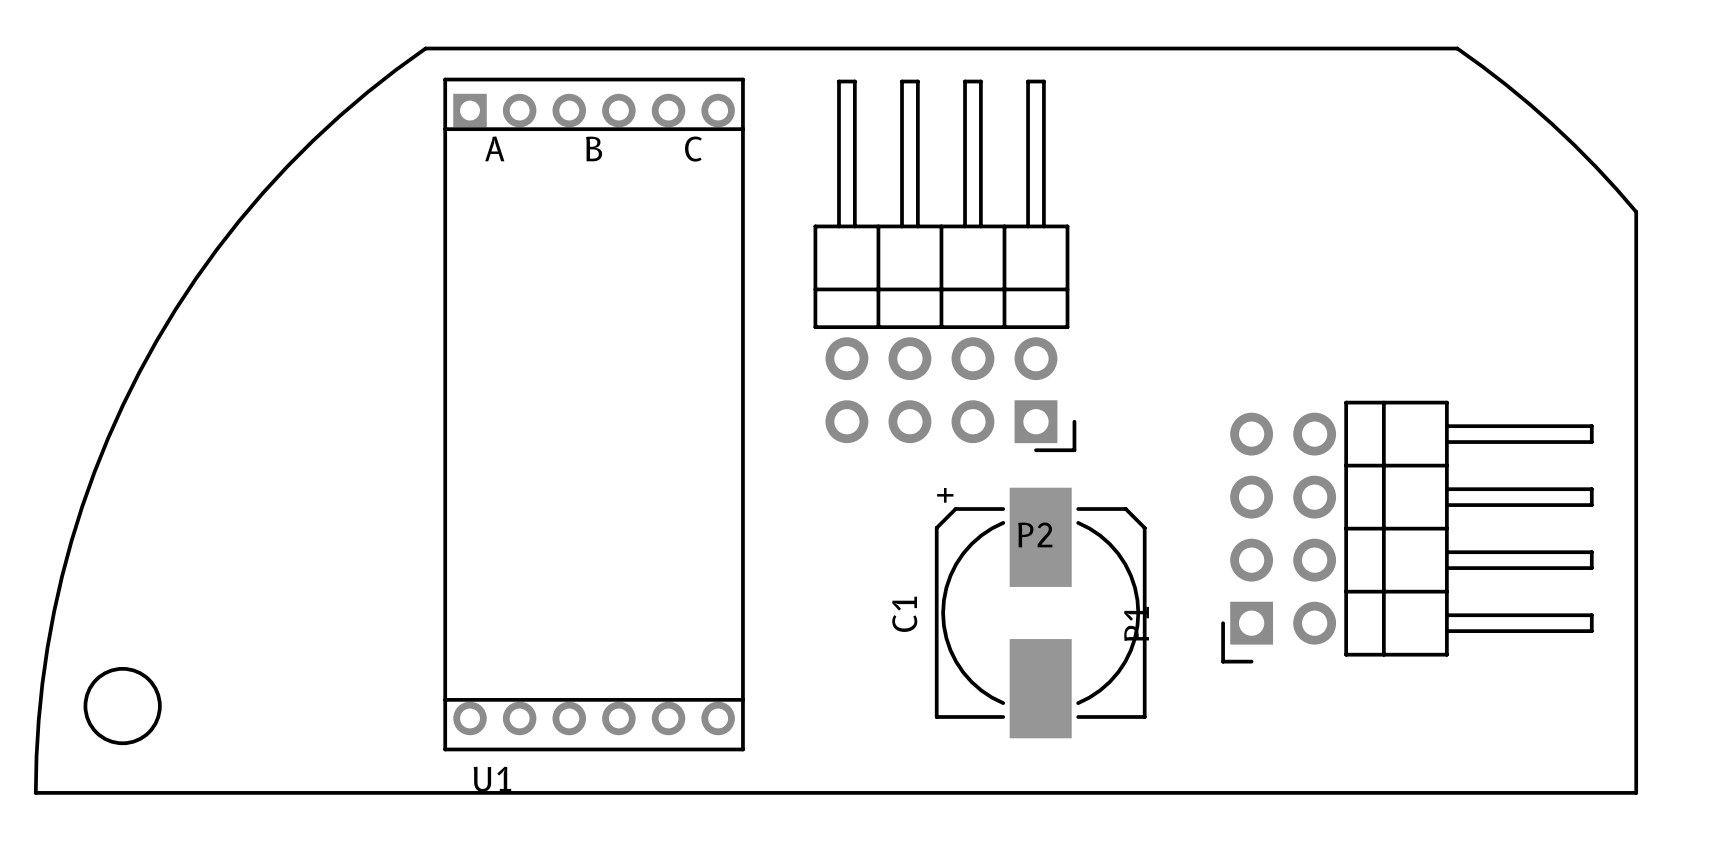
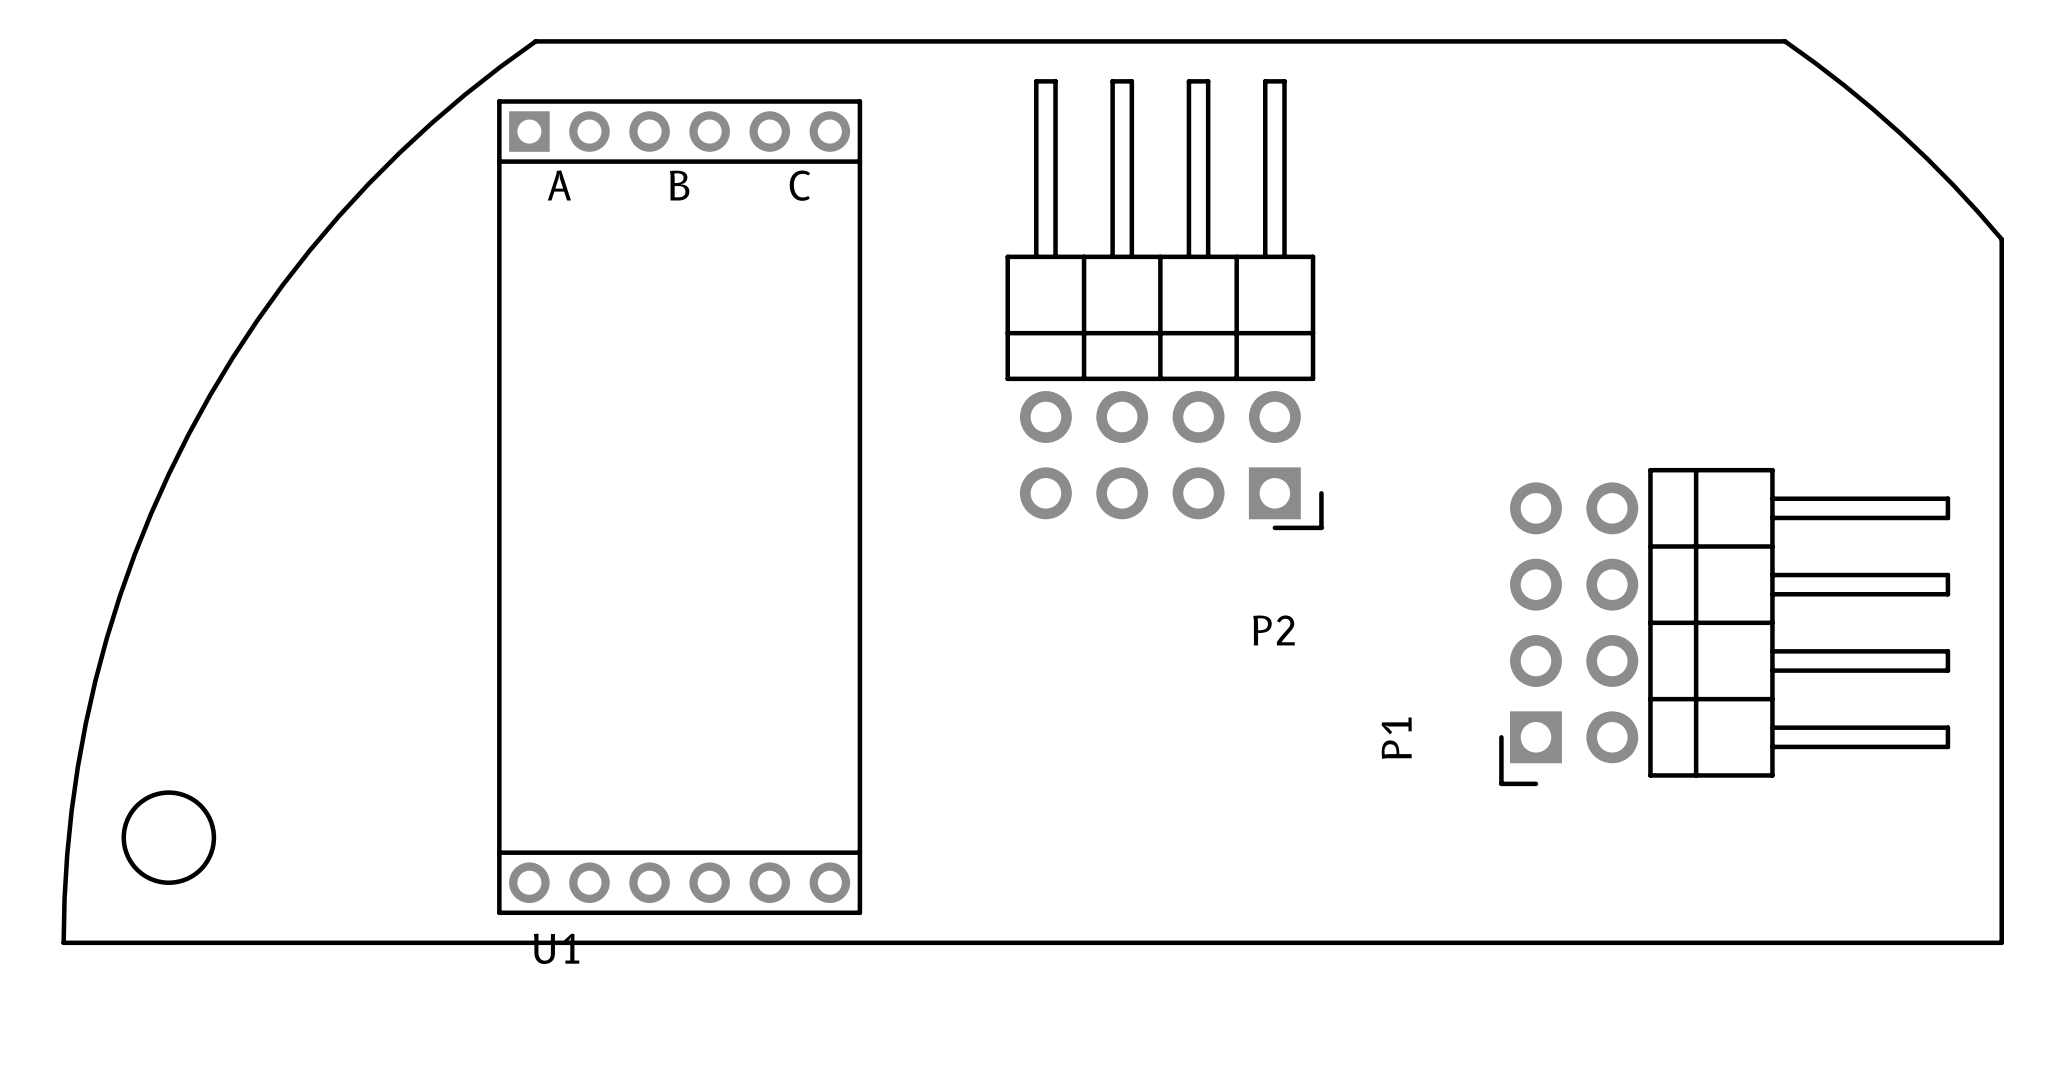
U1 footprint: [443, 77, 745, 752] -> [497, 99, 863, 916]
C1: (1040, 613) -> none

